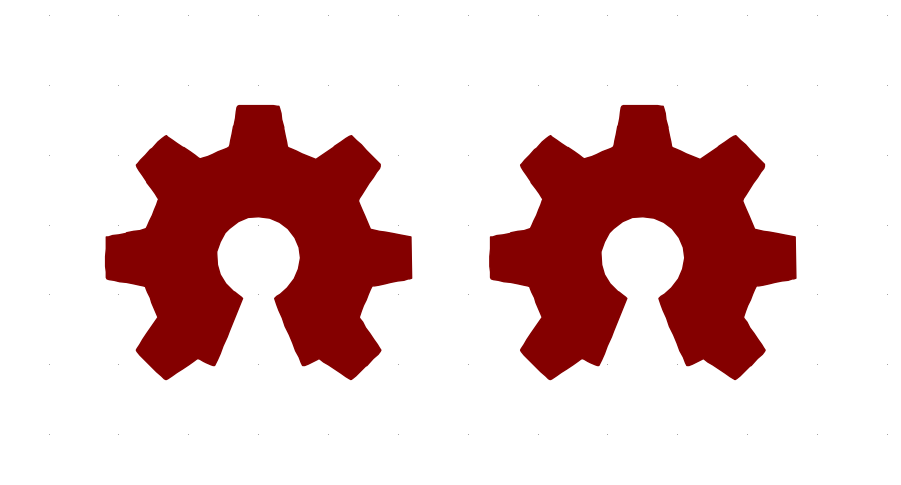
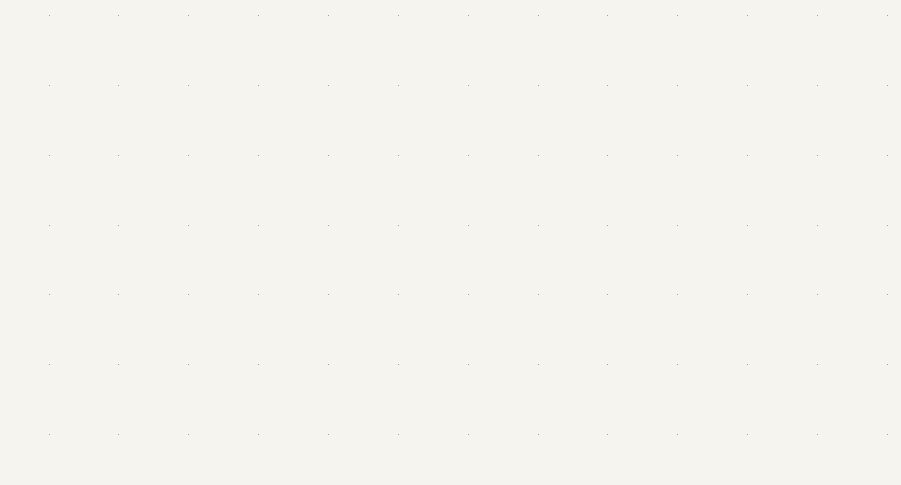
part: (258, 242) -> none
part: (642, 242) -> none

